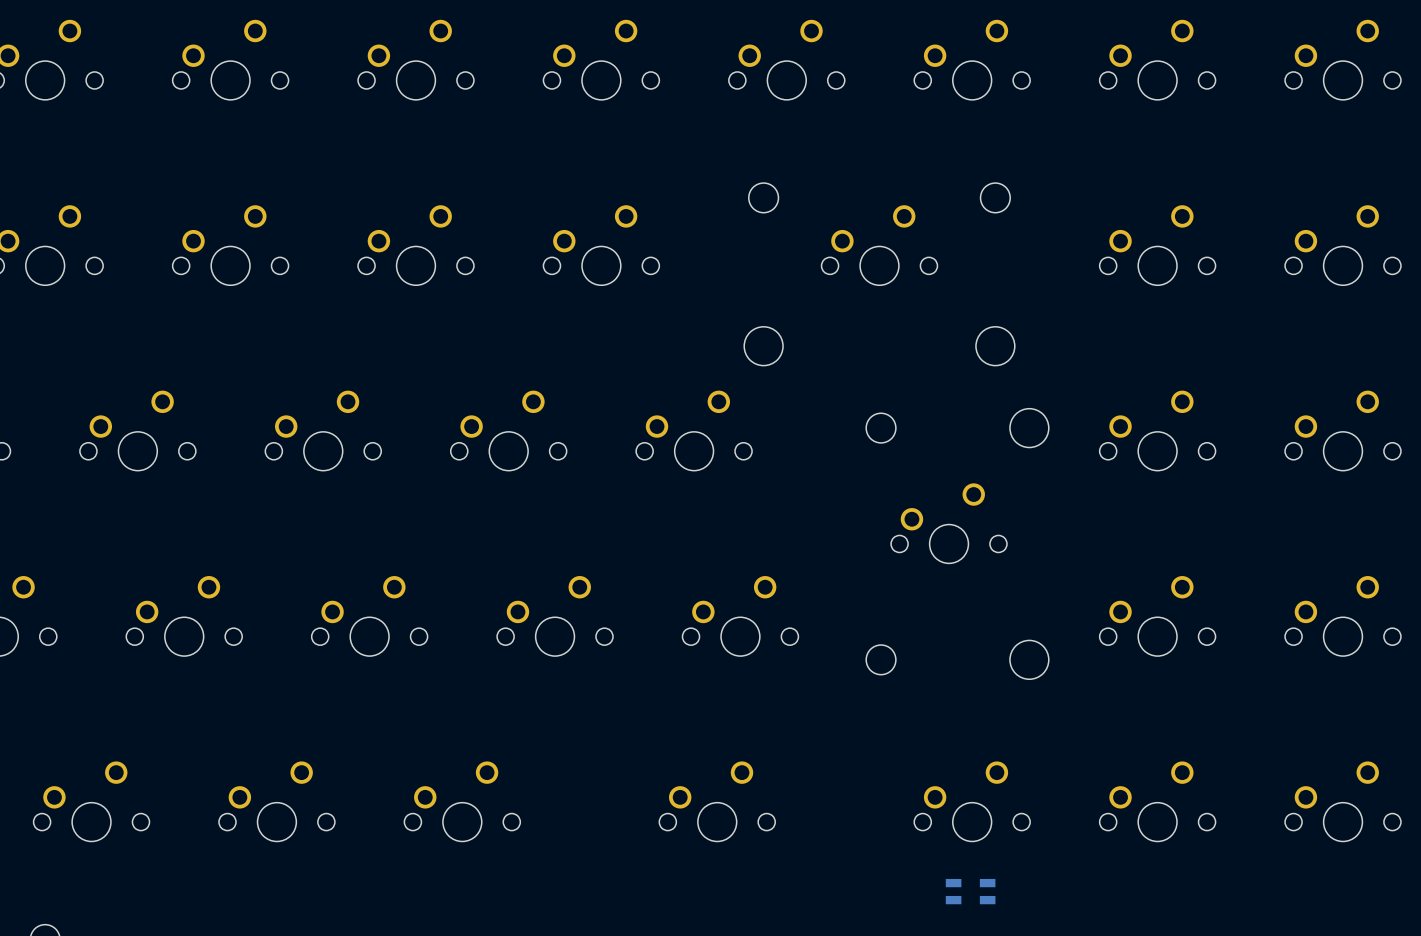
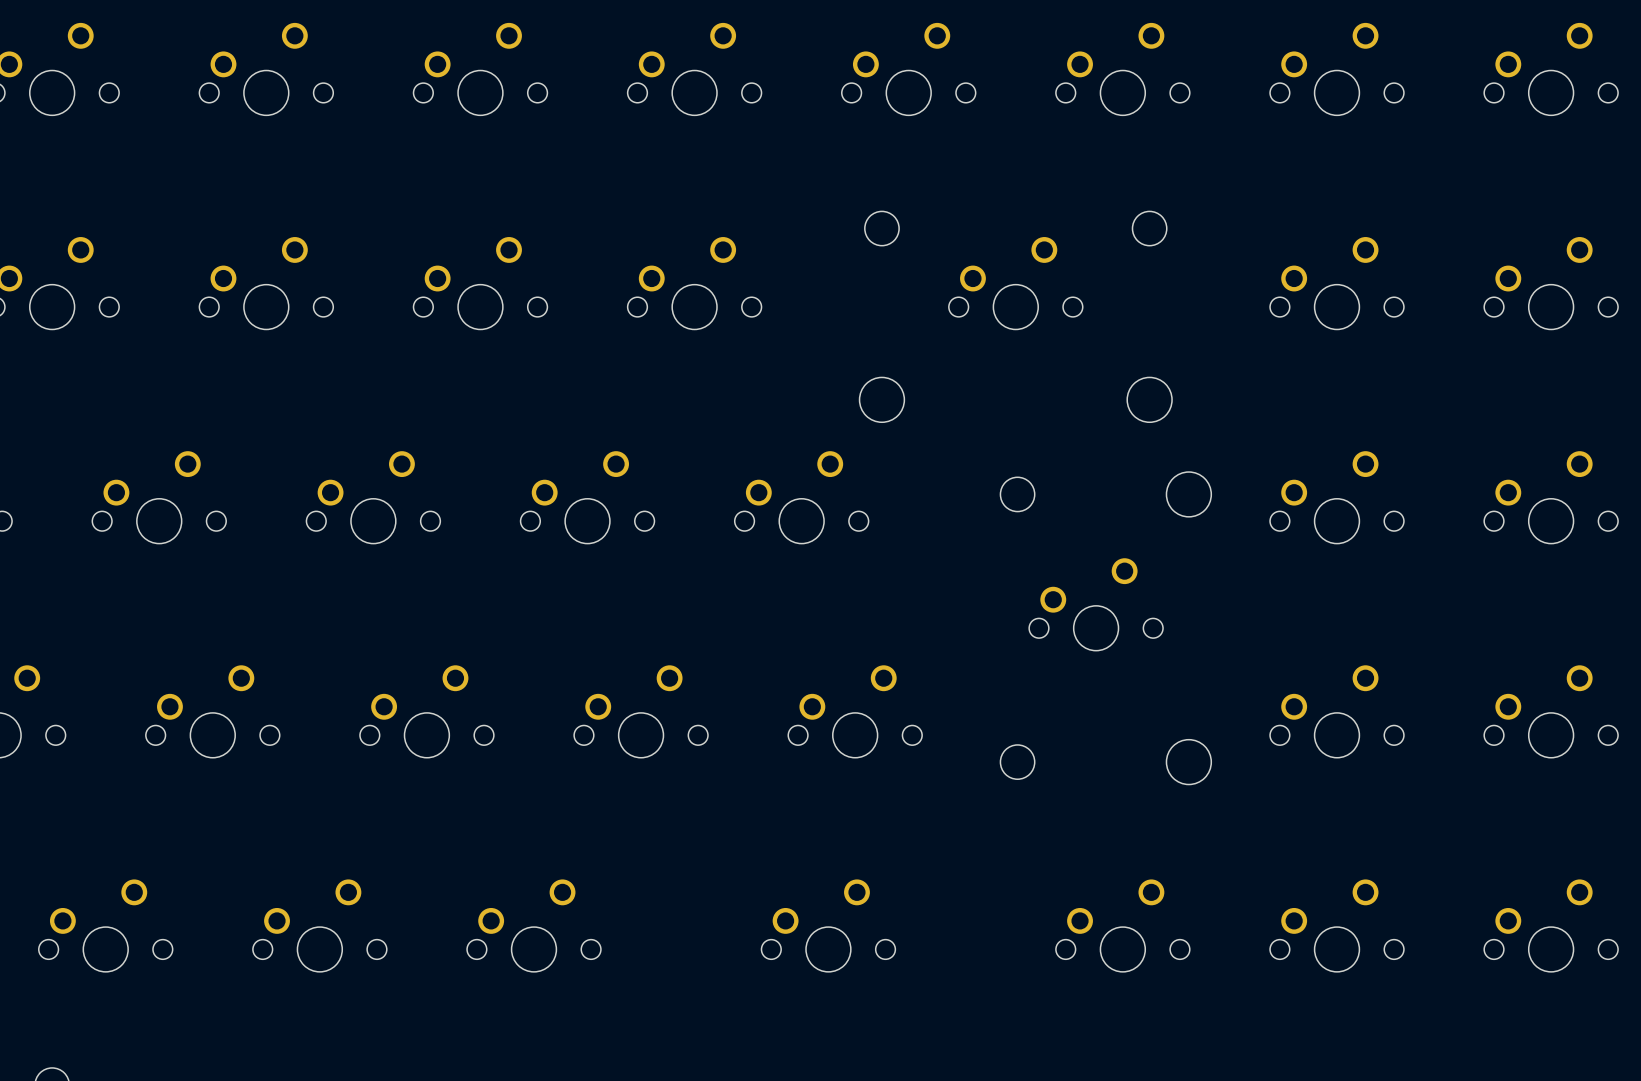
part: (970, 891) -> none

